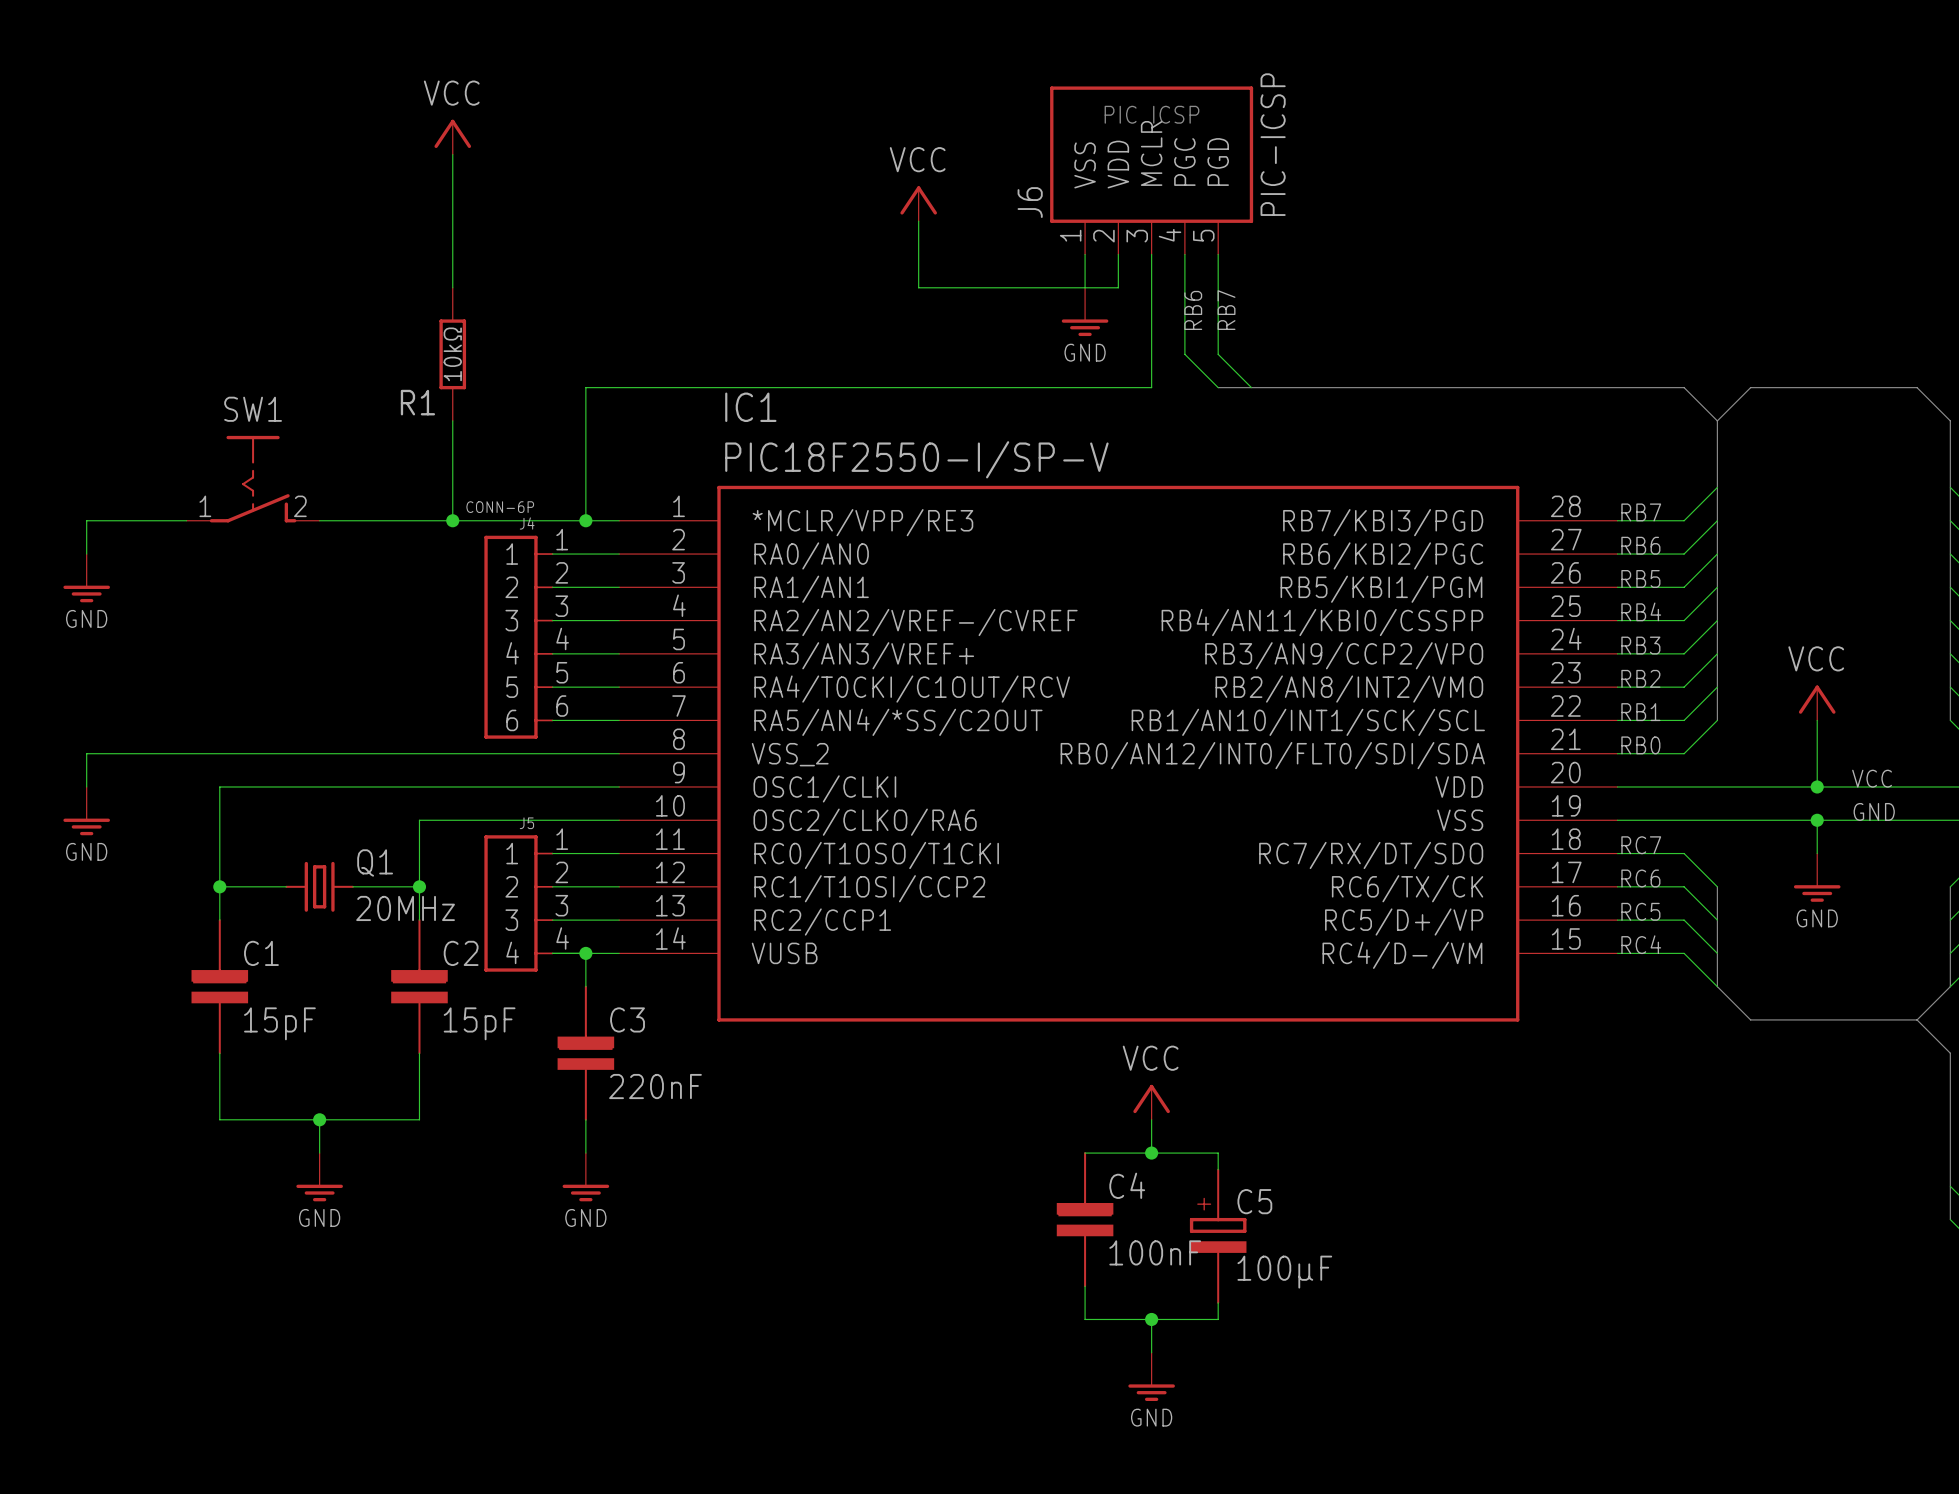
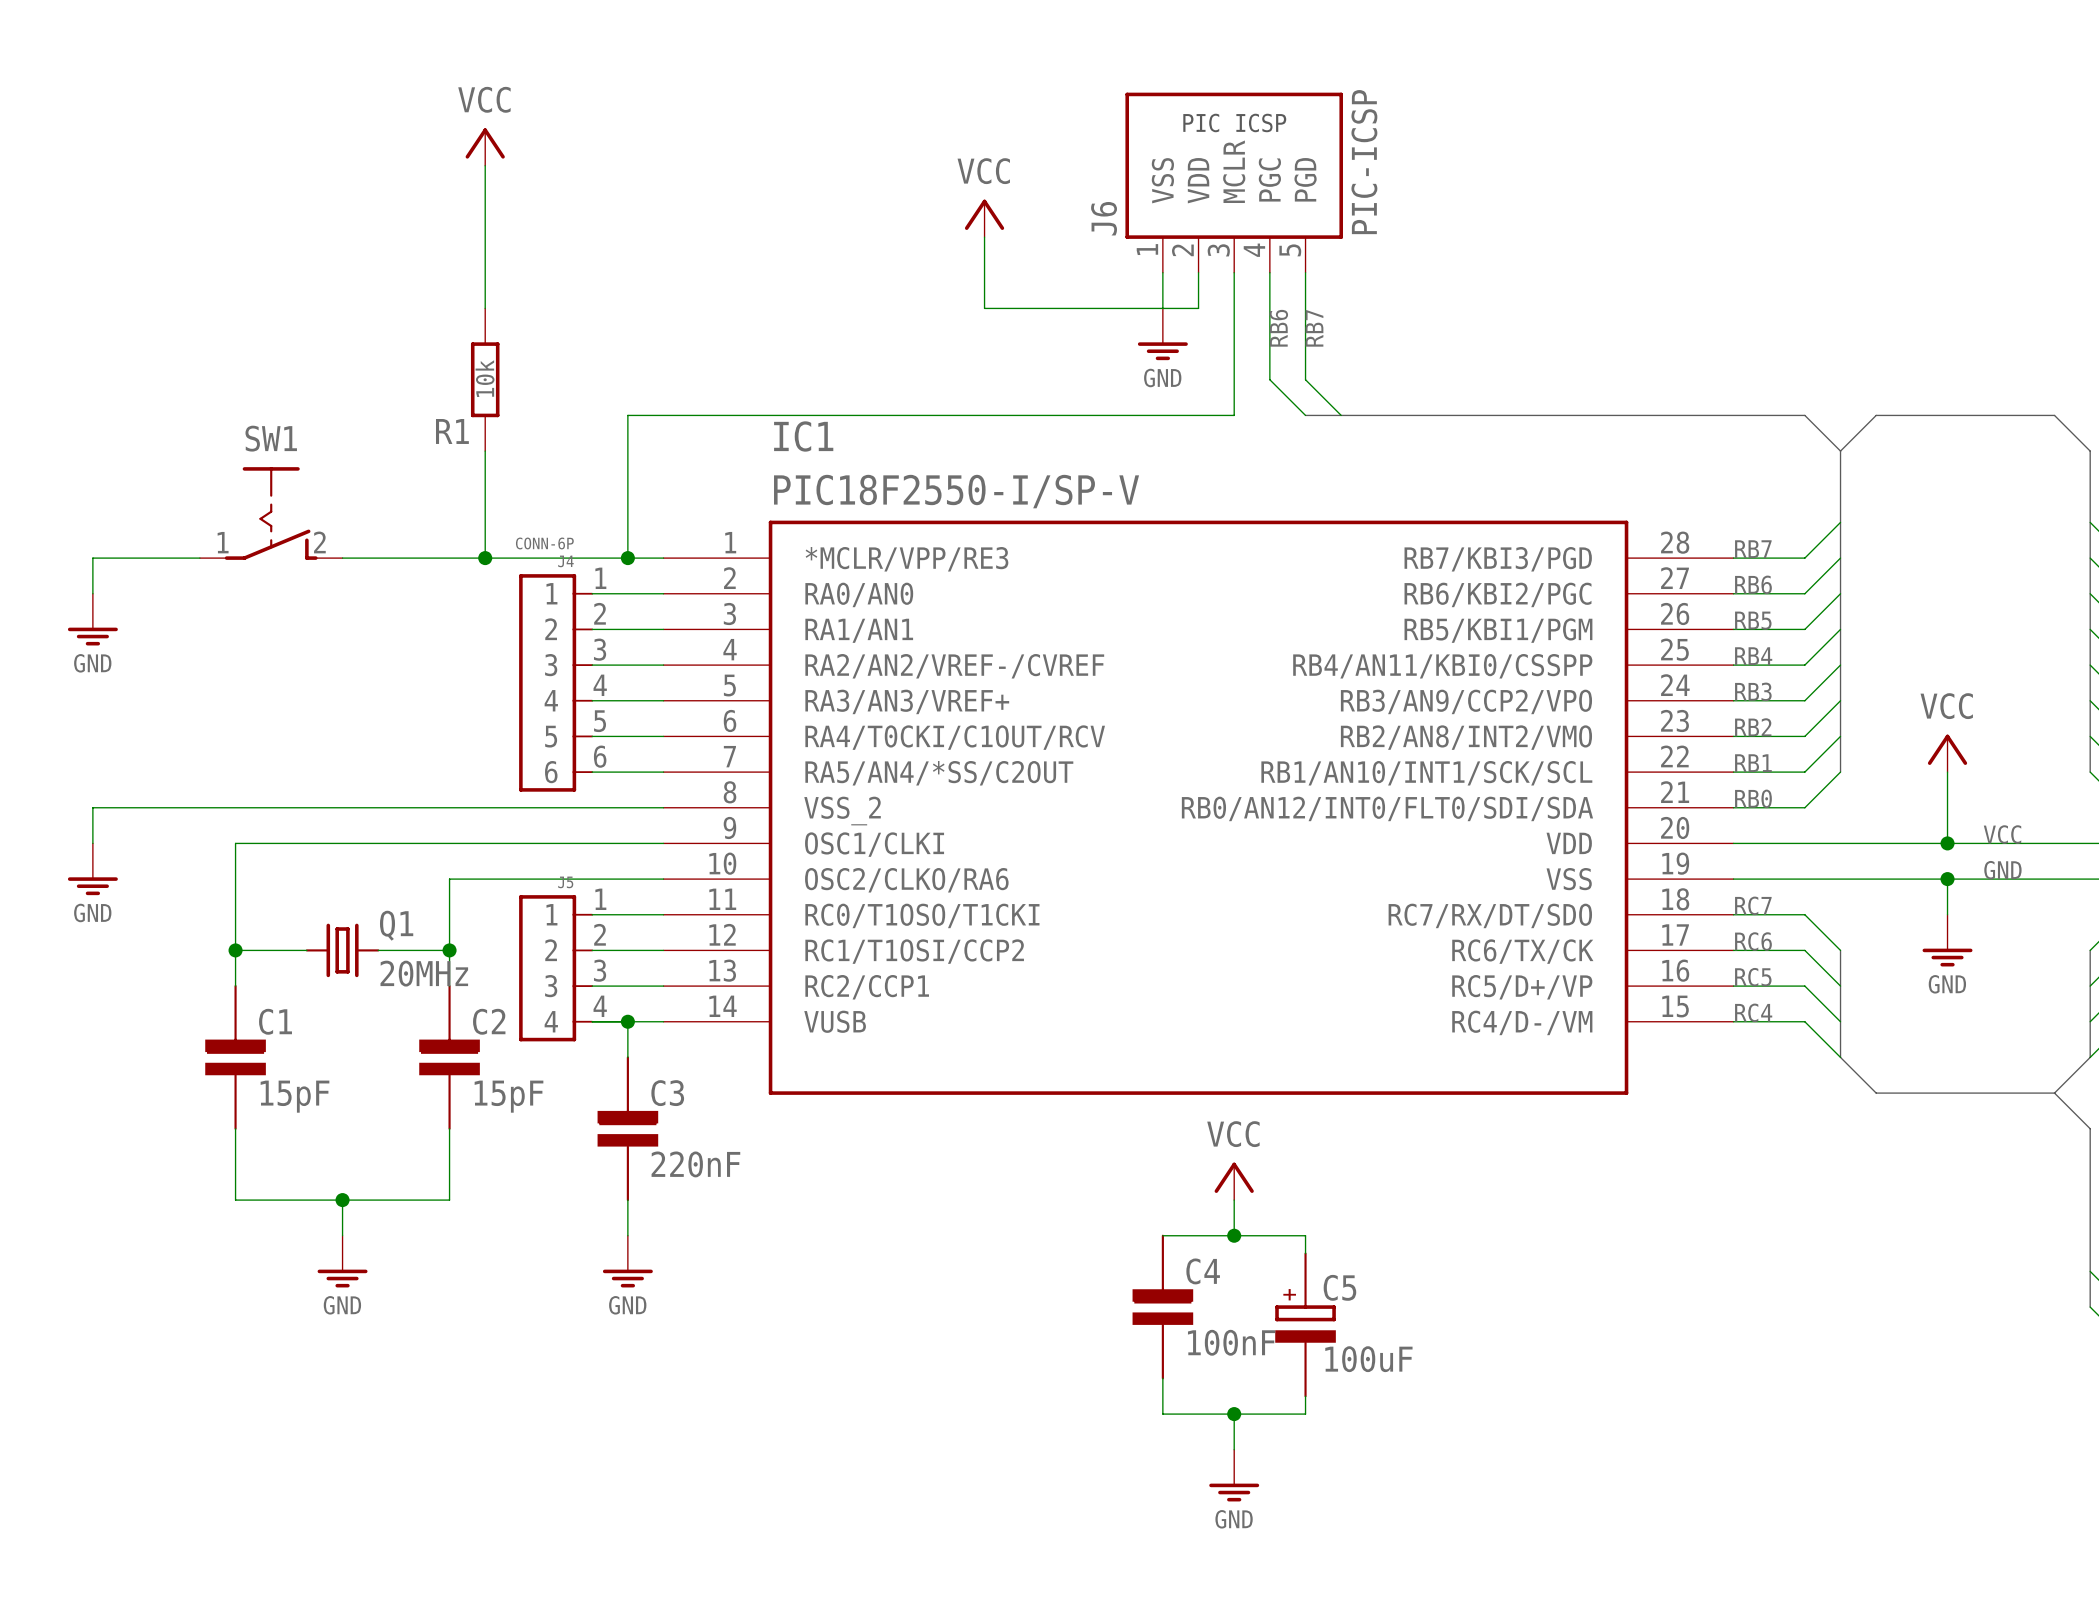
R1 value: 10kΩ (452, 354) -> 10k (485, 378)
C5 value: 100μF (1284, 1272) -> 100uF (1368, 1359)

